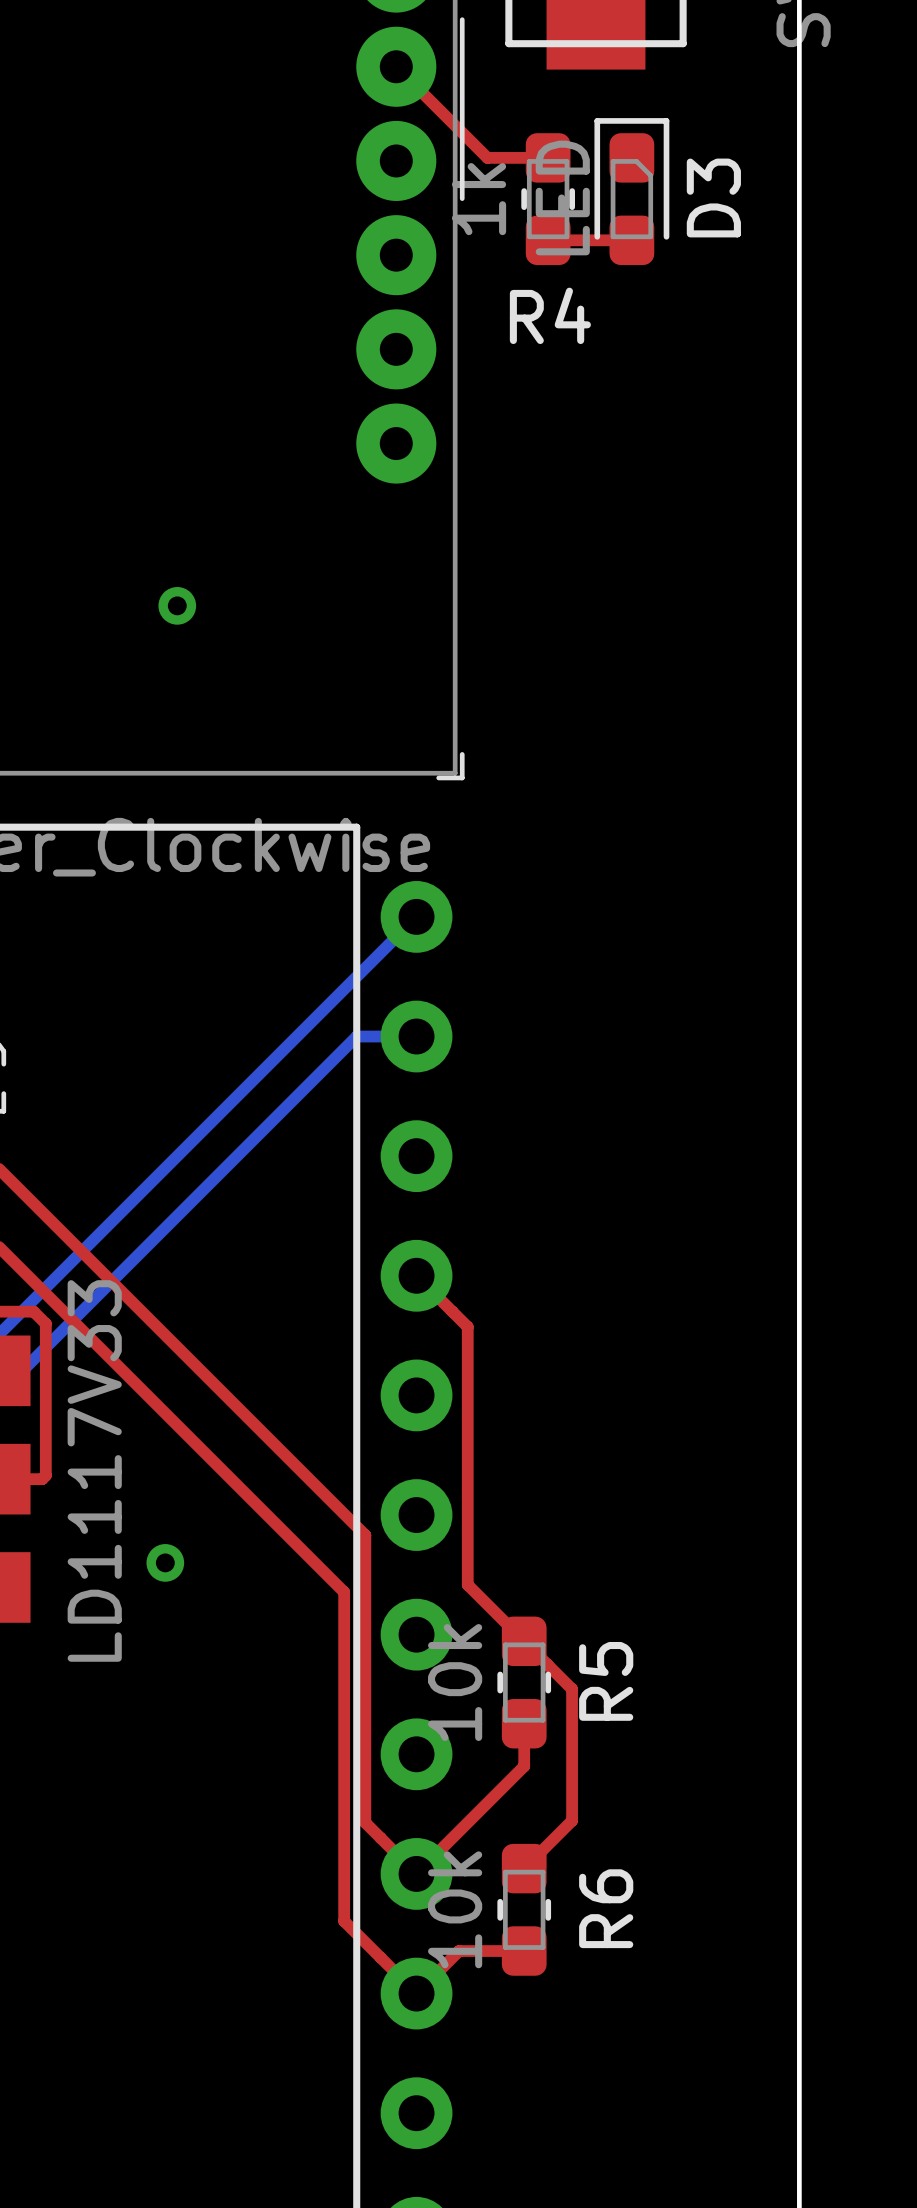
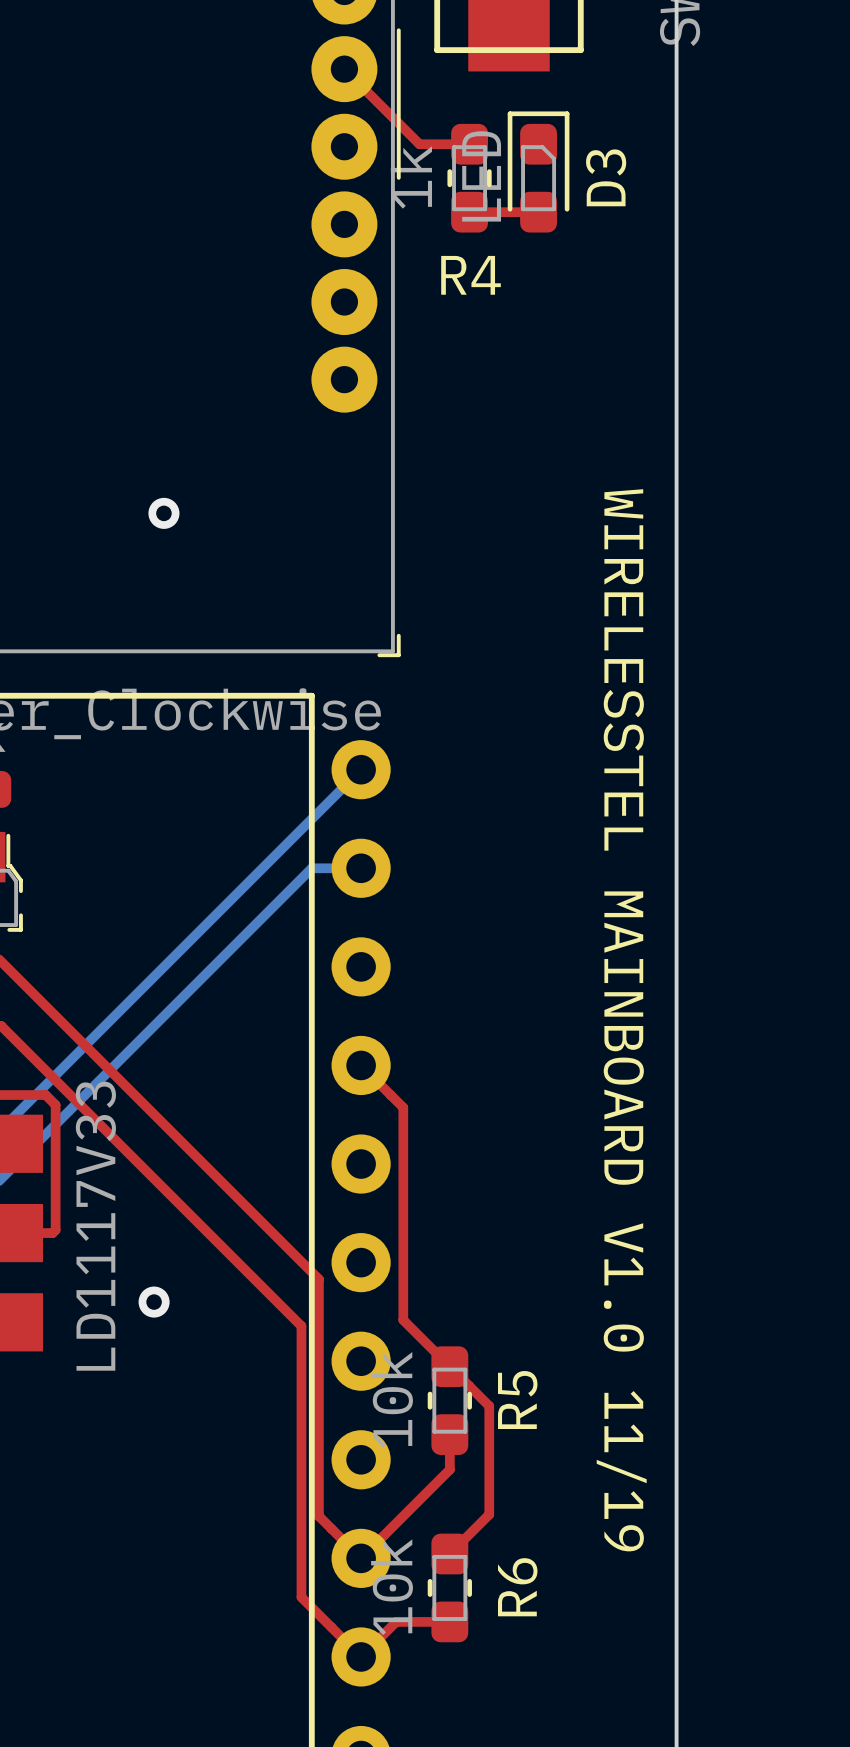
text: none -> WIRELESSTEL MAINBOARD V1.0 11/19 (621, 1020)

